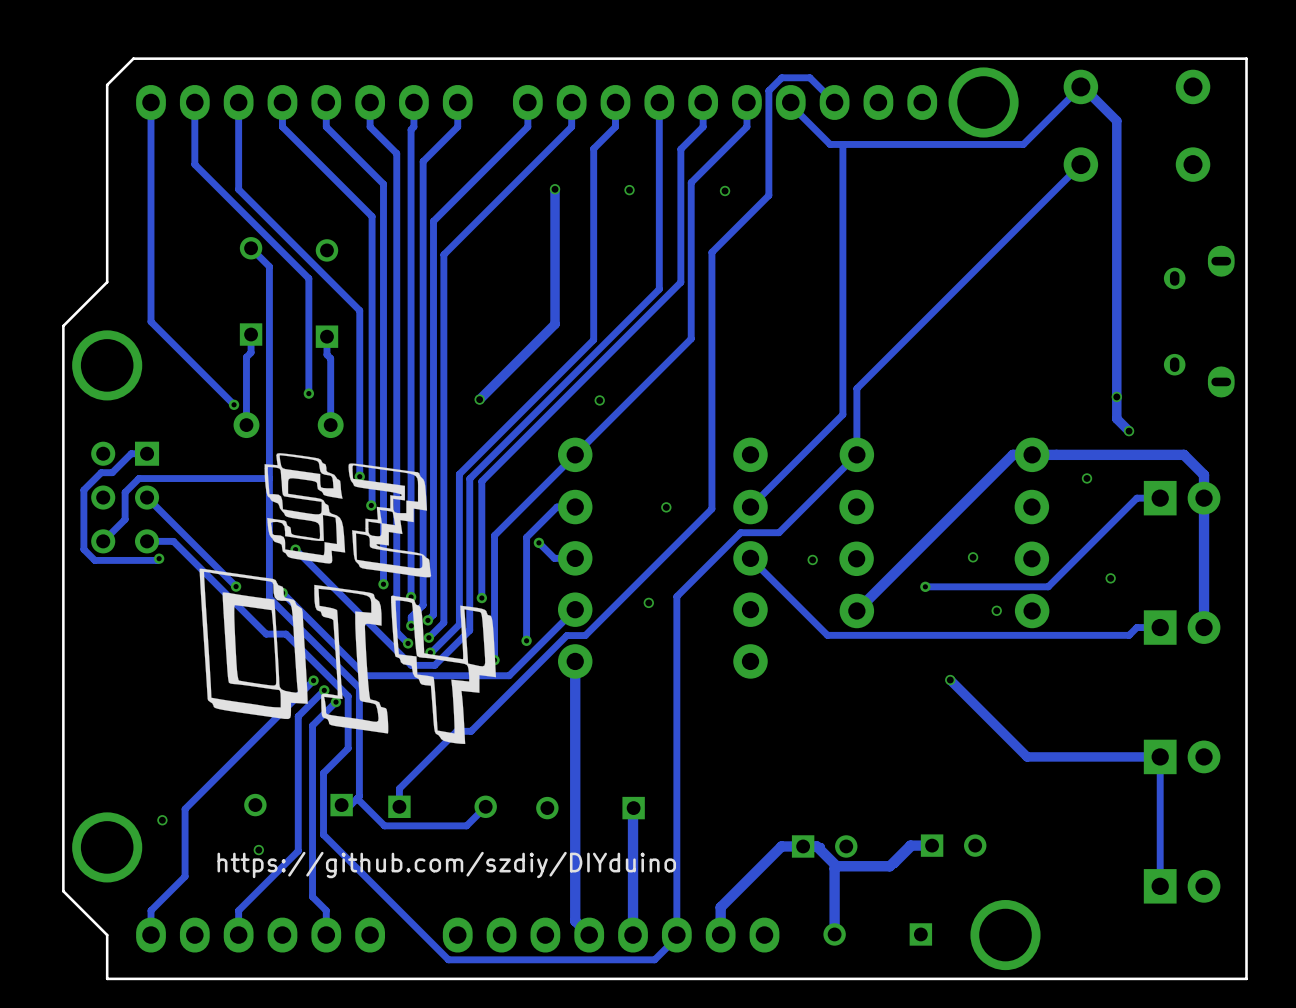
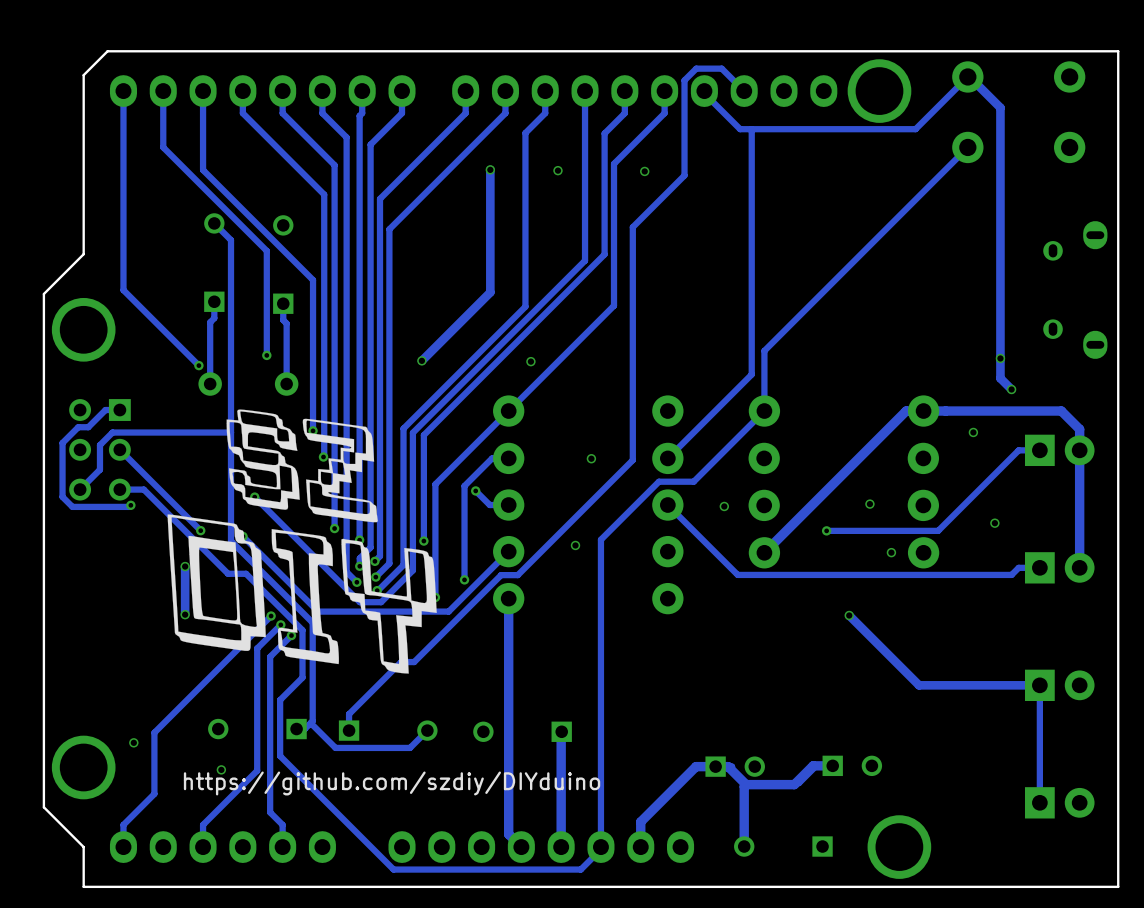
track: none -> (185, 566) (185, 614)
via: none -> (185, 566)
via: none -> (185, 614)

